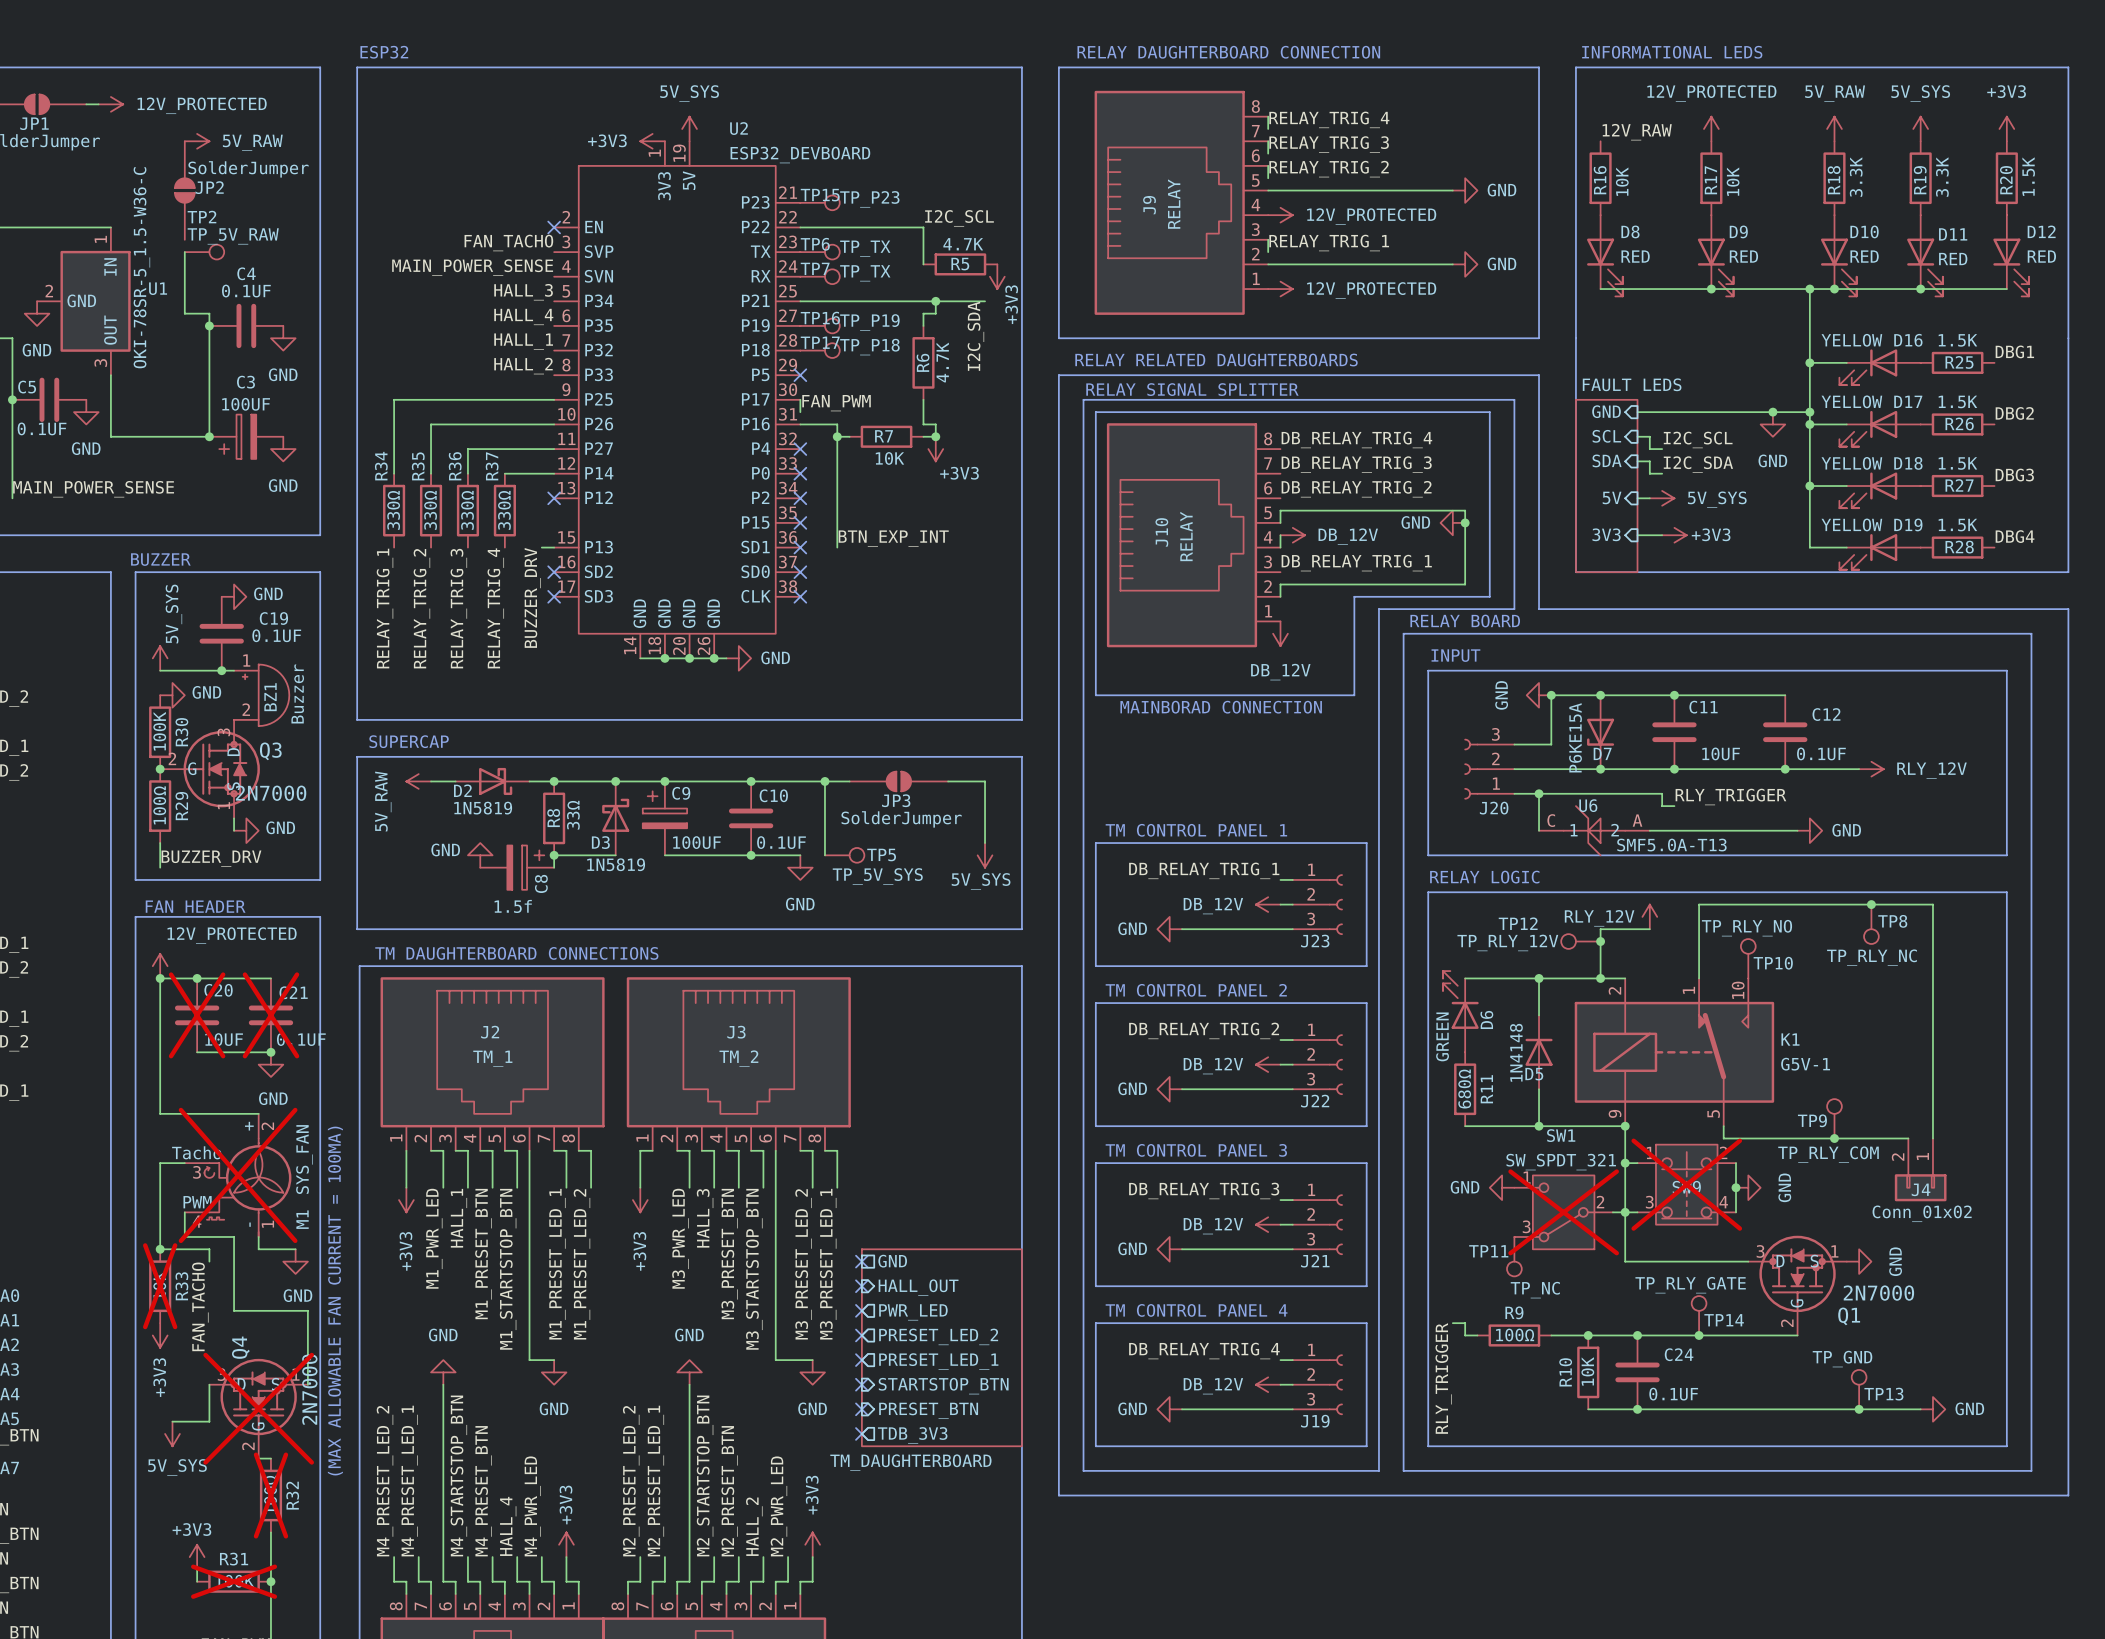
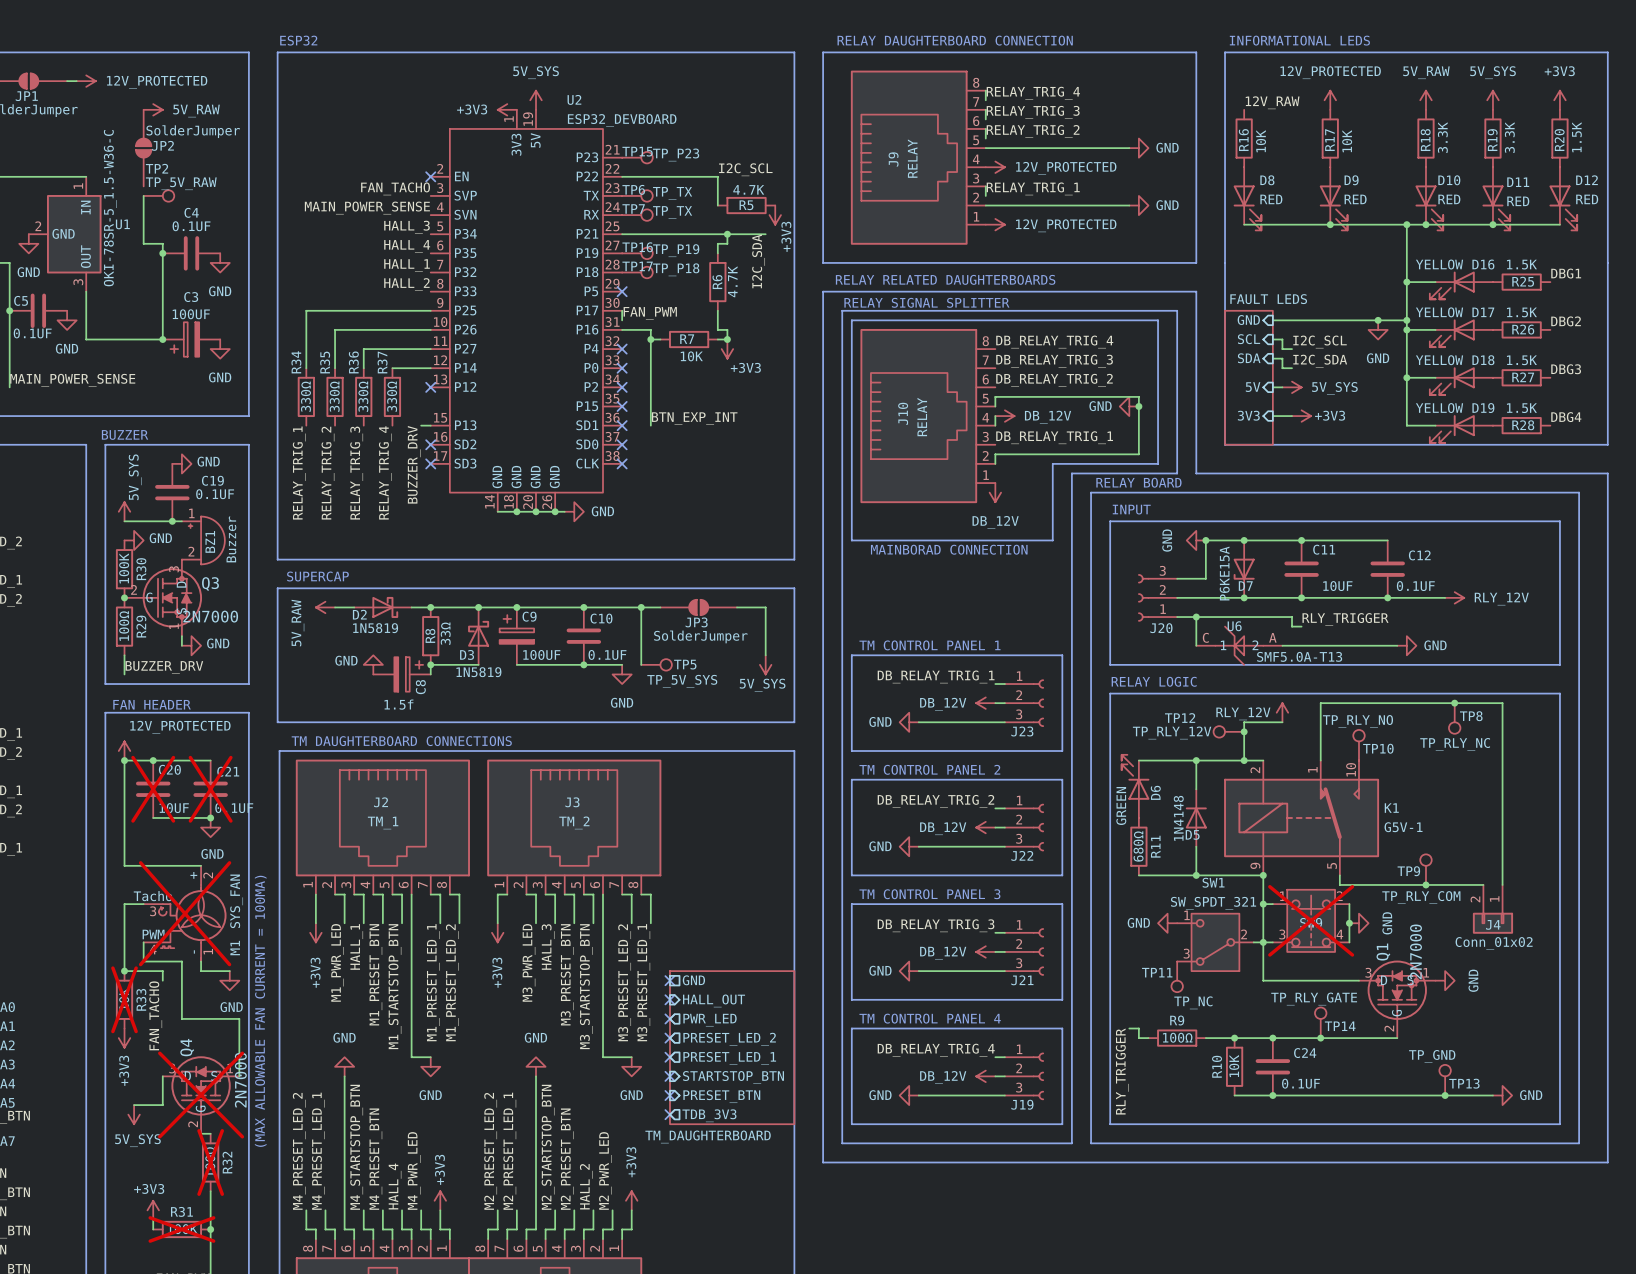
SW1 do-not-place cross: (1563, 1212) -> none
Q1 value rotation: 0° (1878, 1293) -> 90° counterclockwise (1415, 951)
Q1 name rotation: 0° (1849, 1316) -> 90° counterclockwise (1383, 952)
Q1 name position: Q1 (1849, 1316) -> Q1 (1383, 952)

